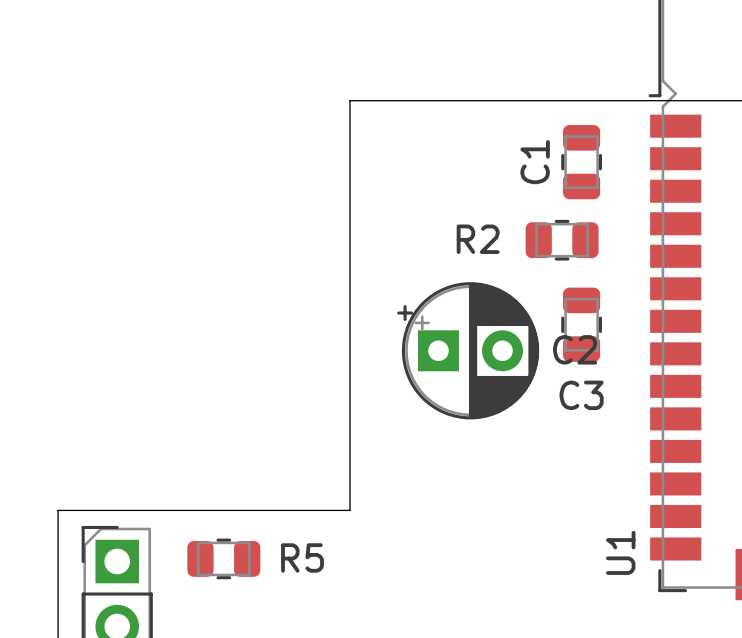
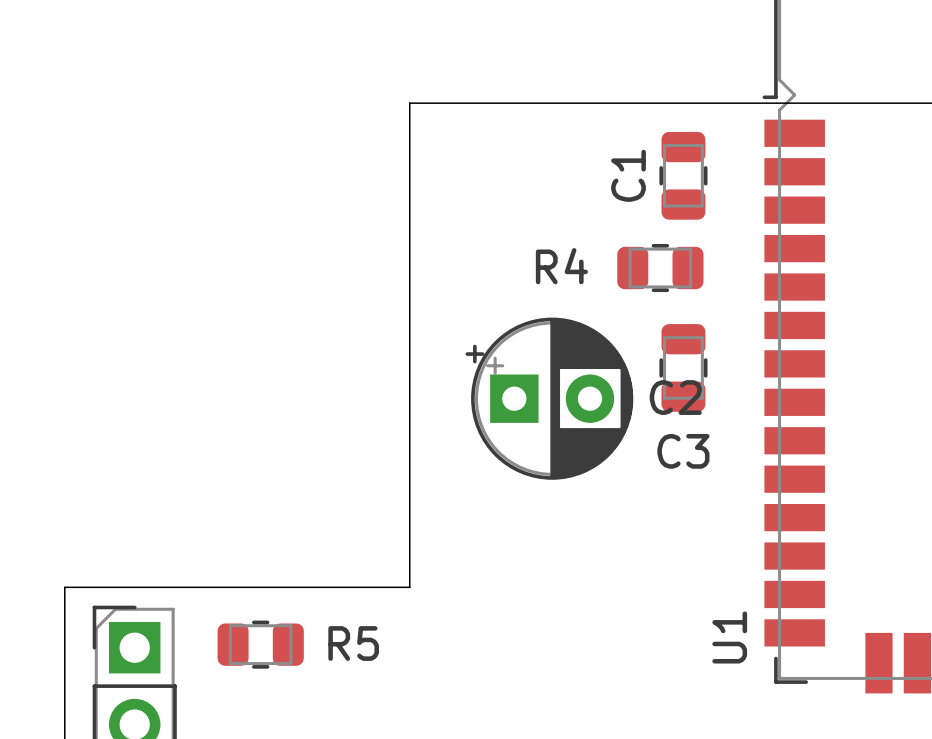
R2 name: R2 (478, 239) -> R4 (561, 266)

